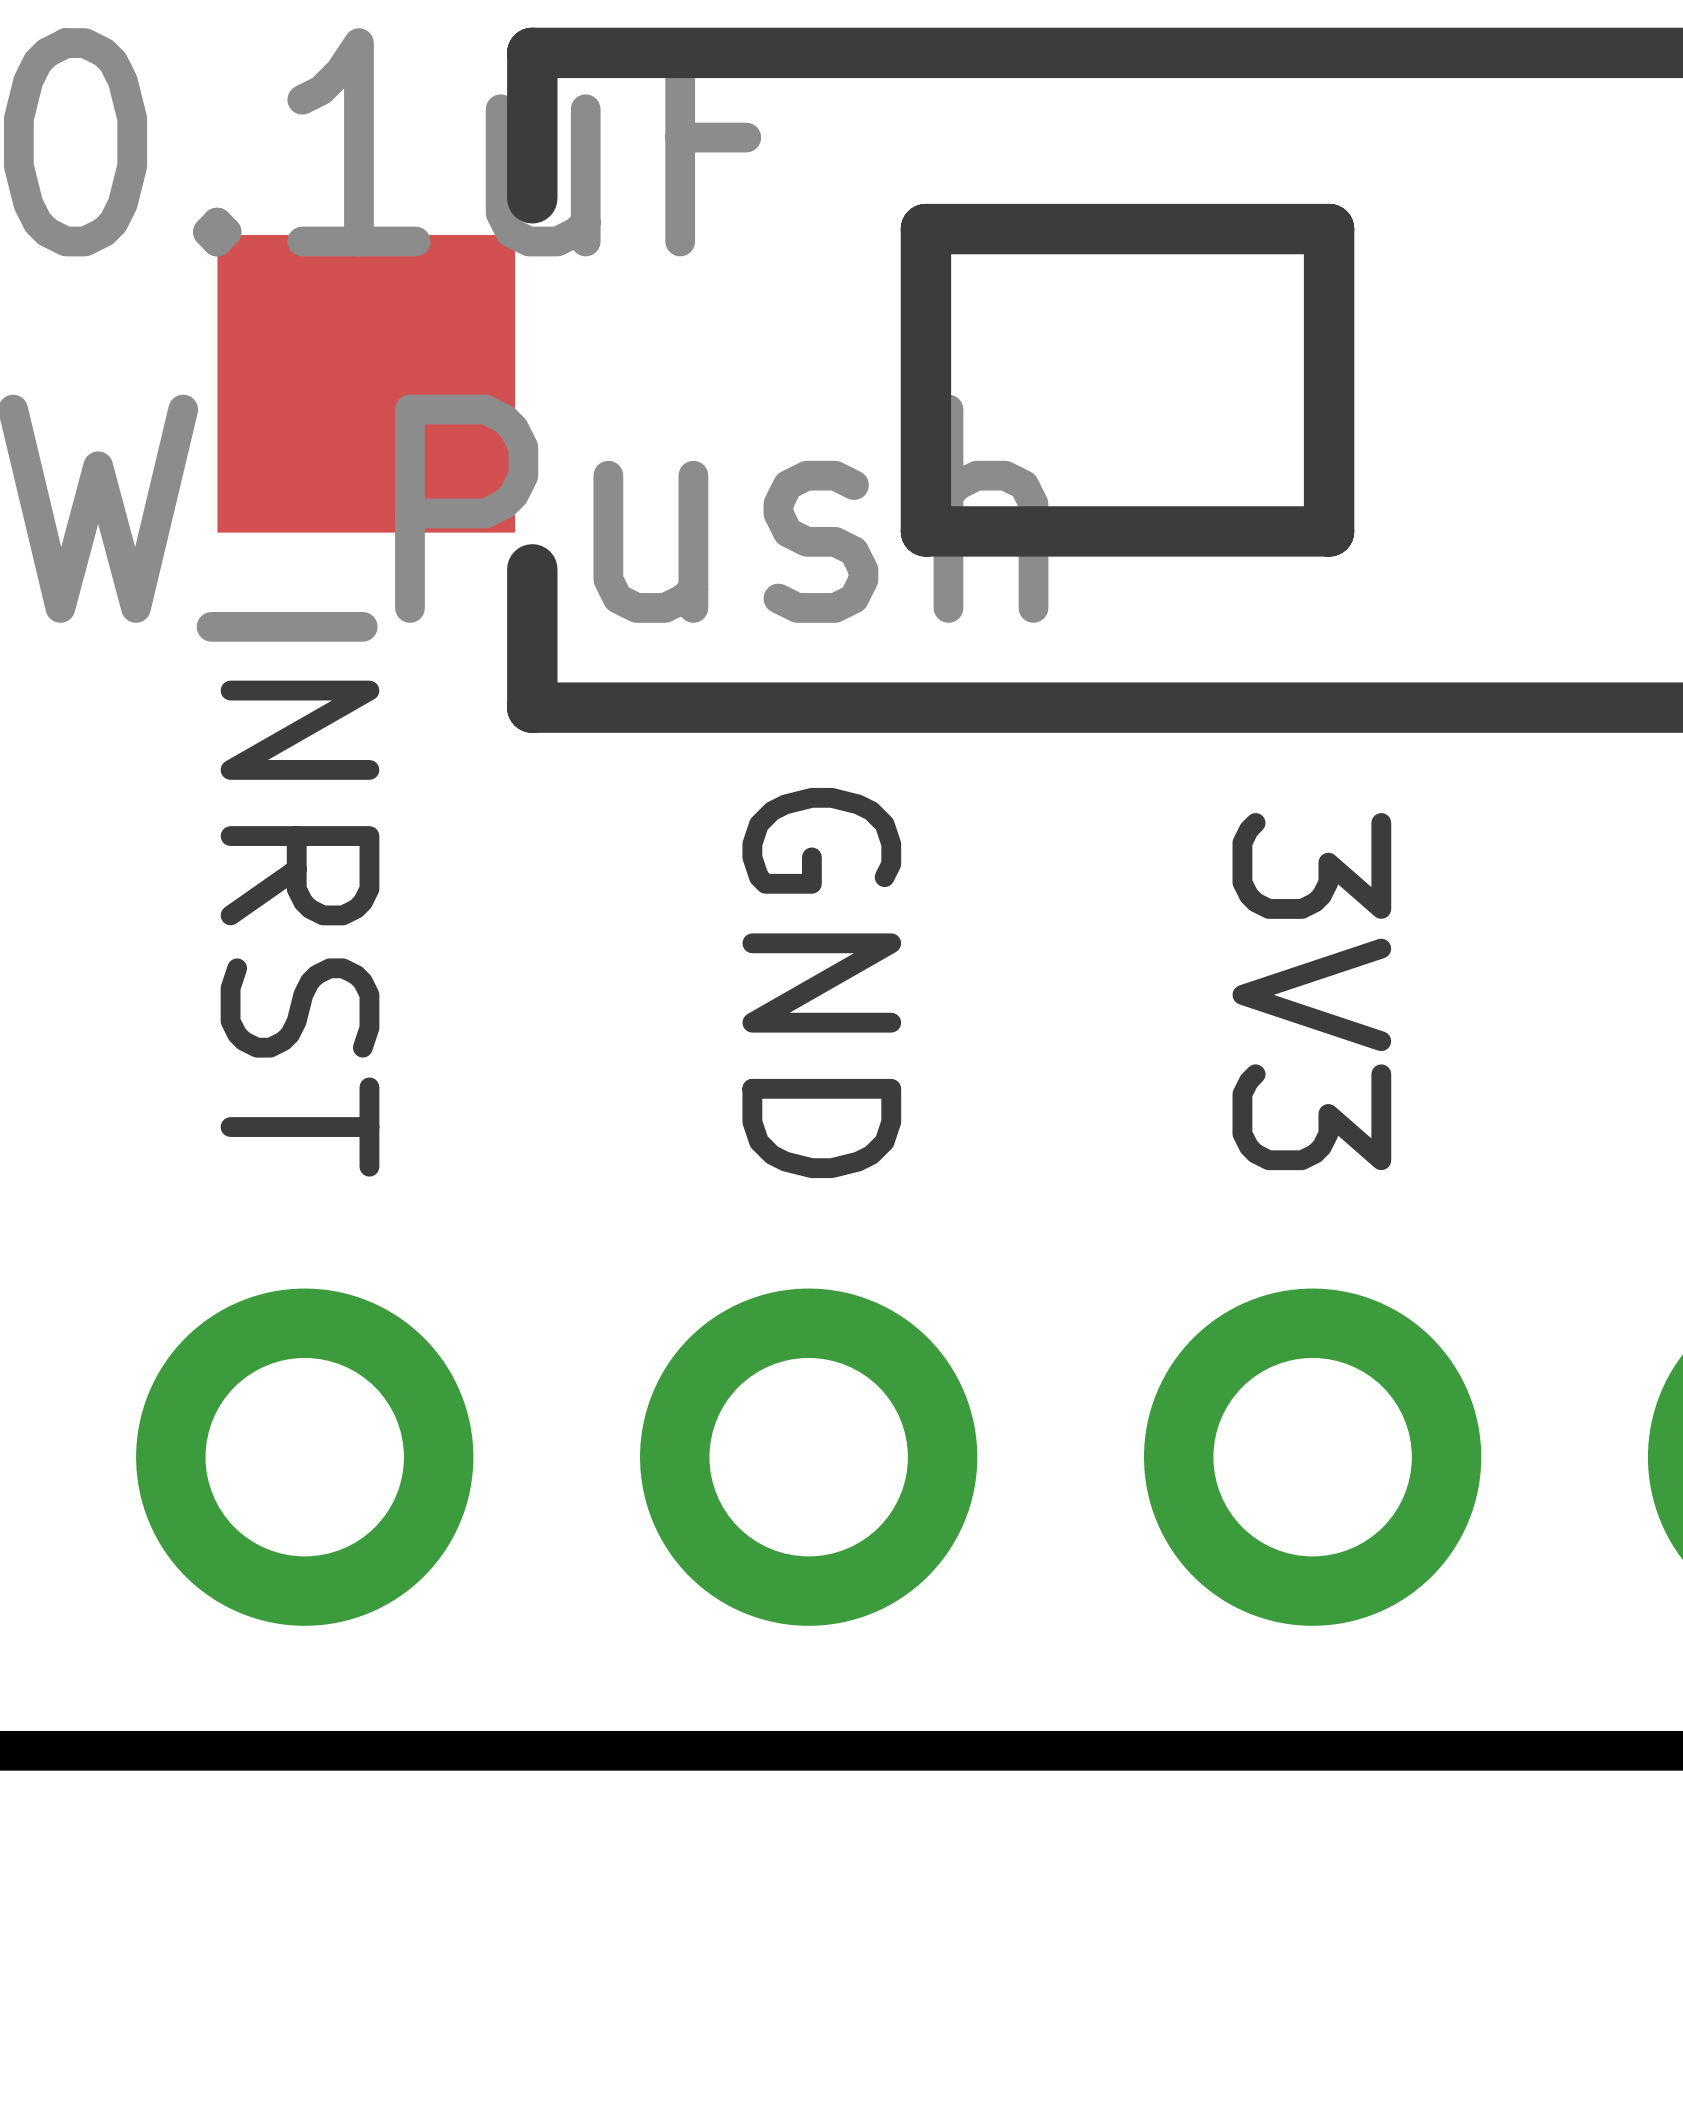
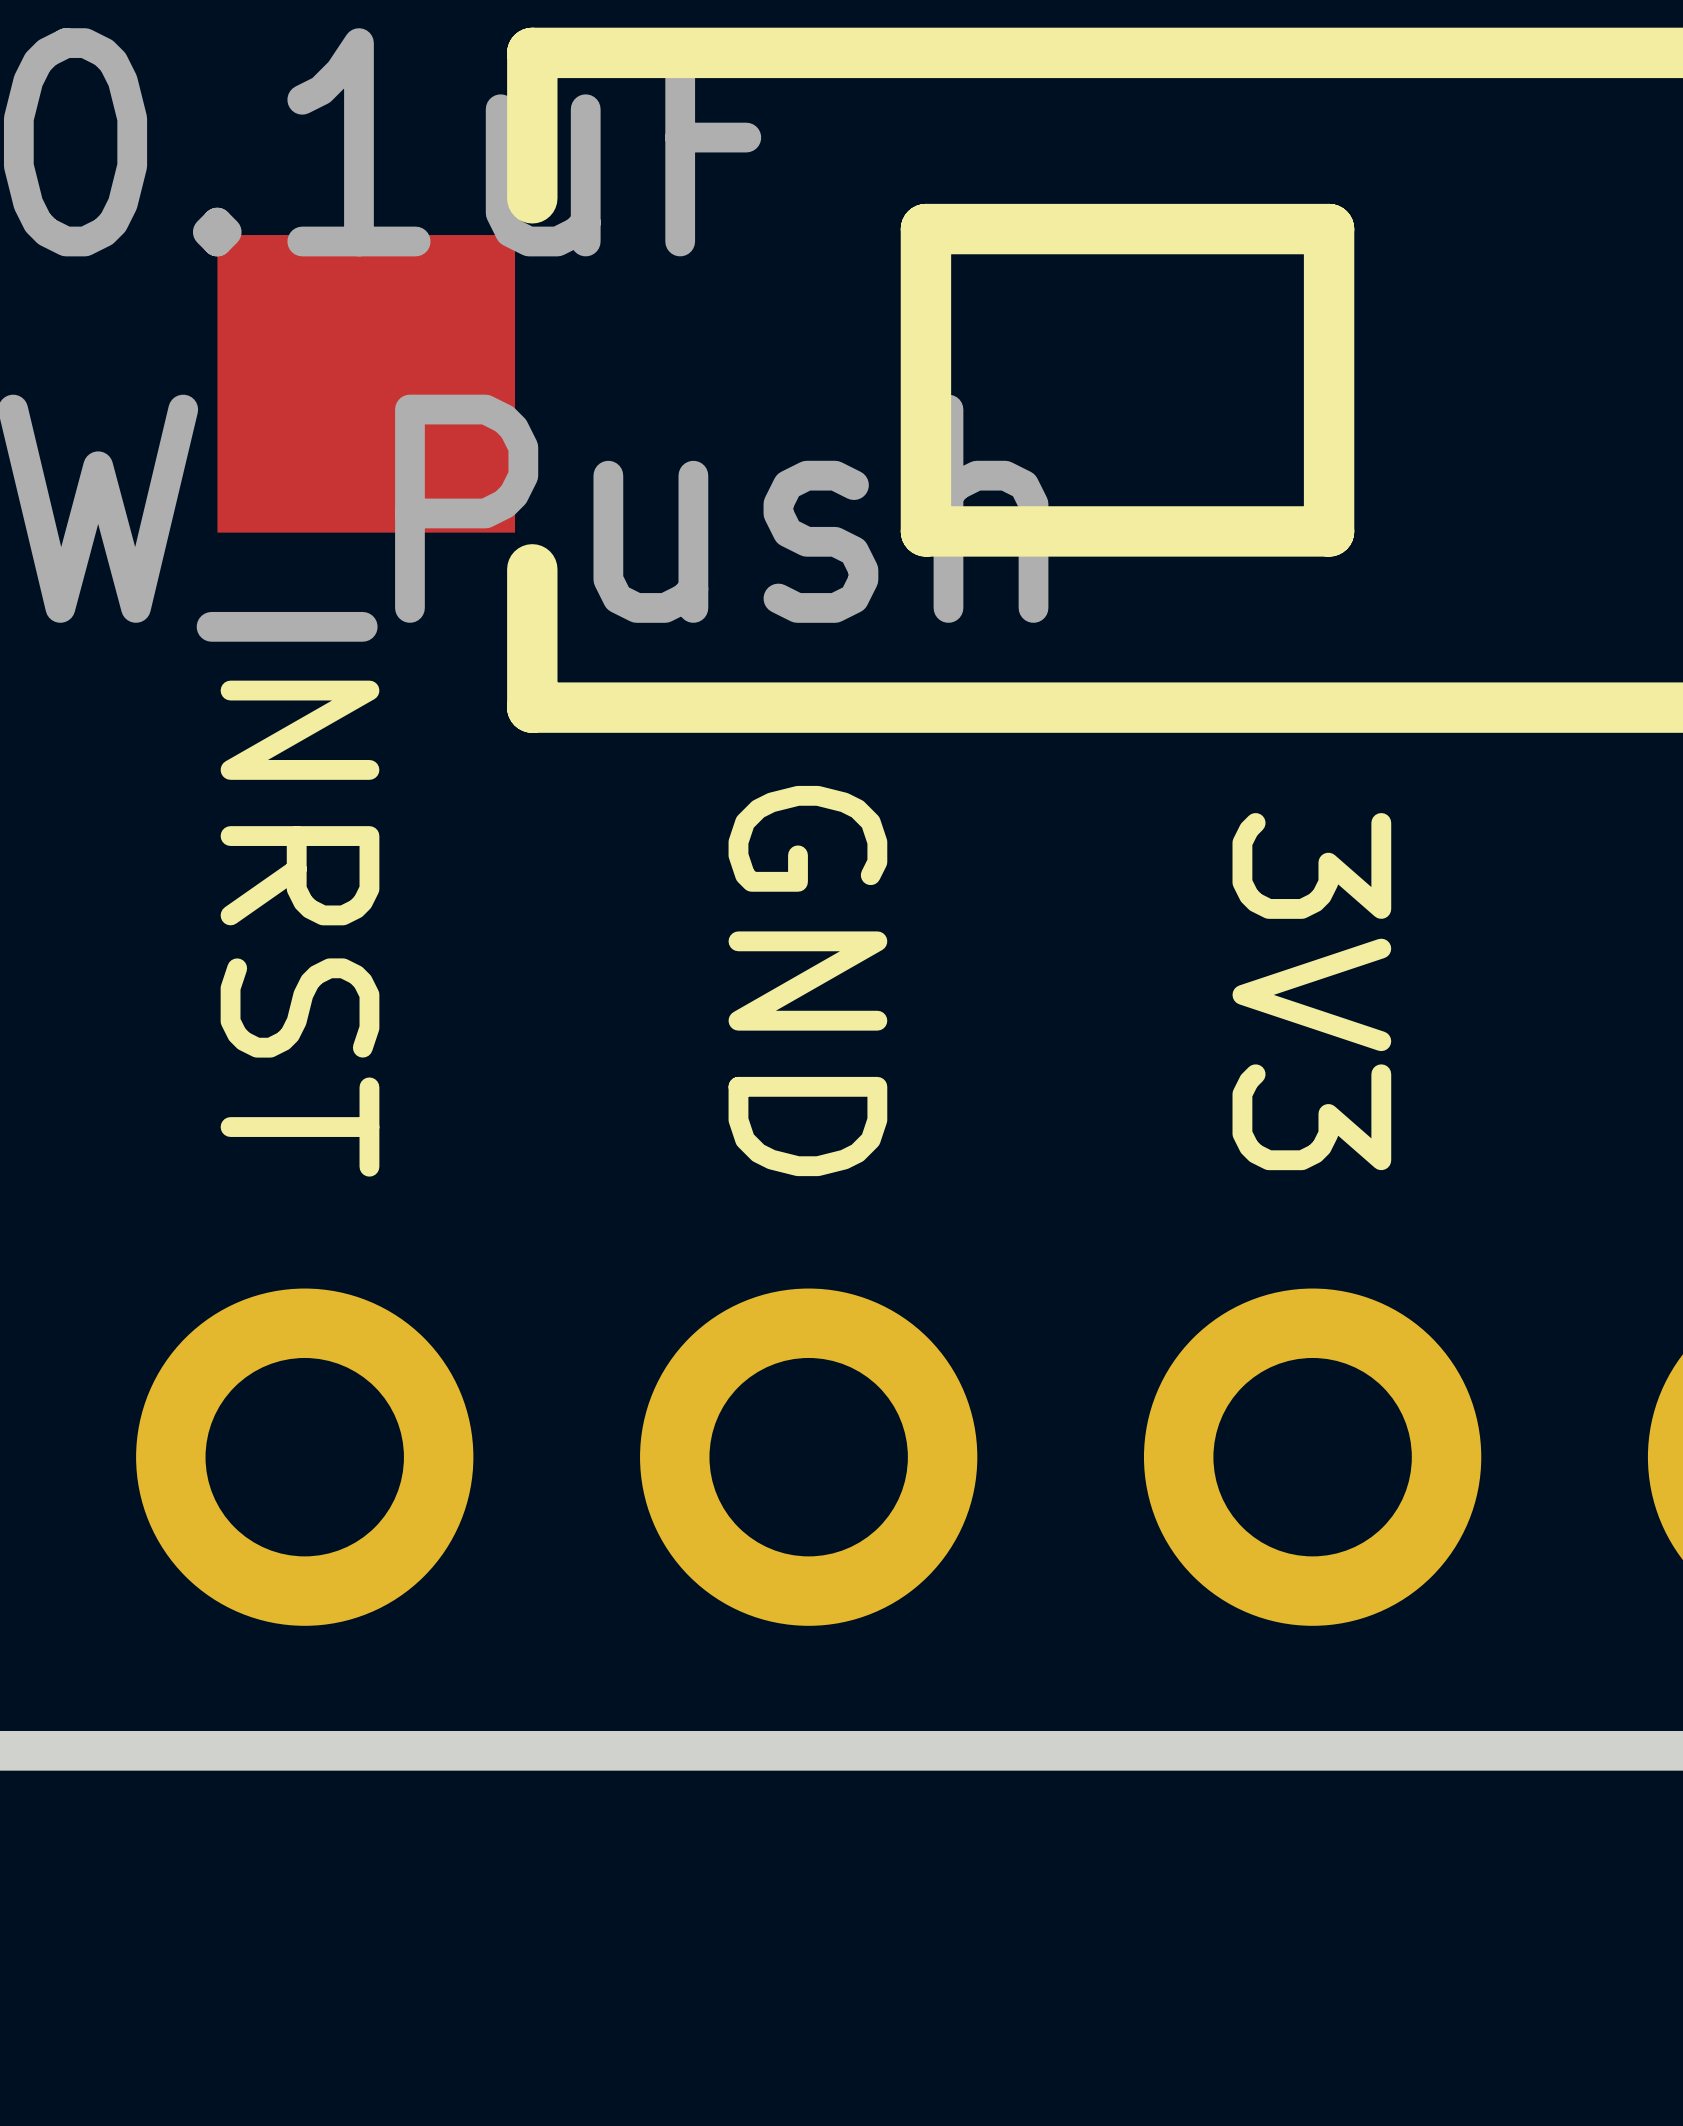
text position: GND (821, 983) -> GND (807, 981)

